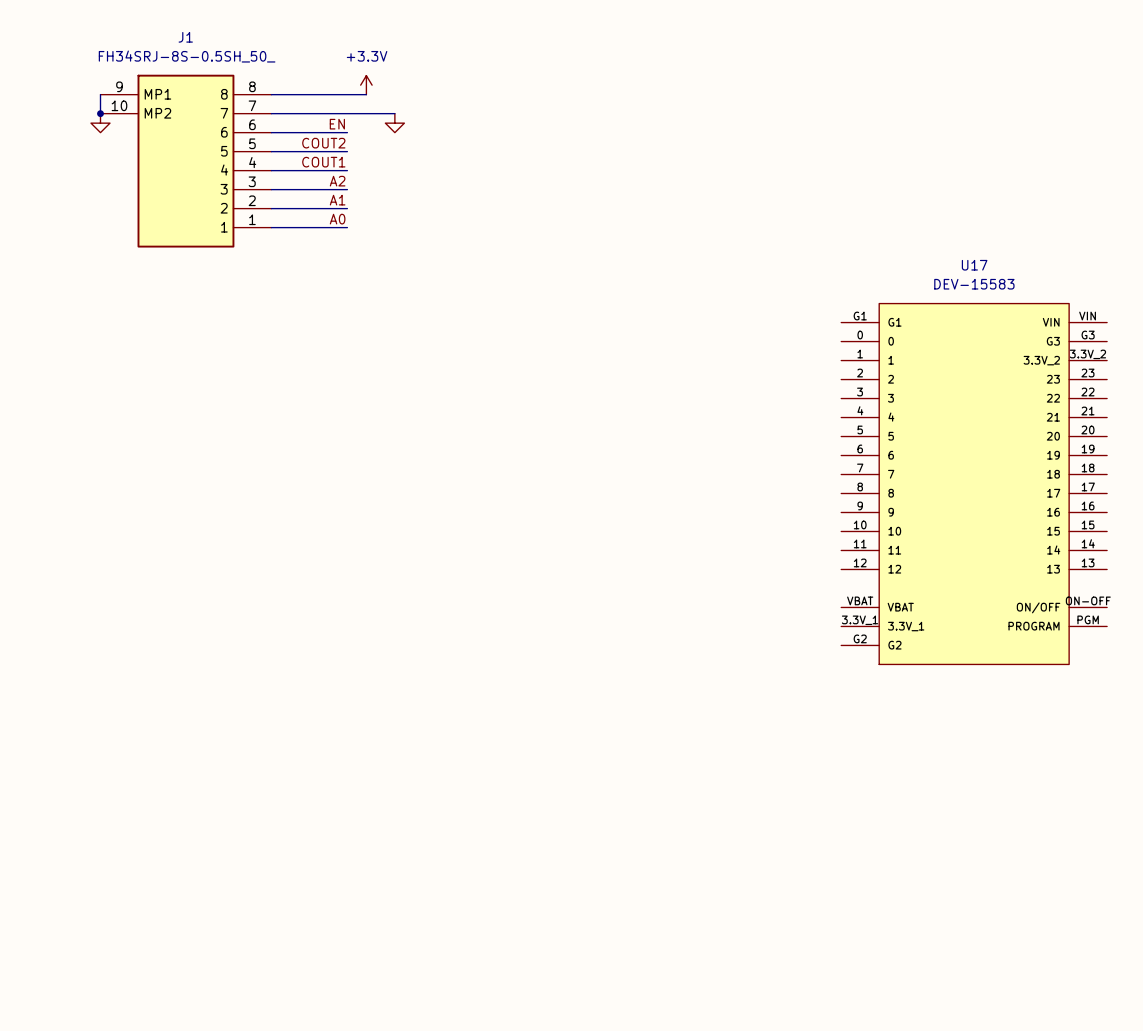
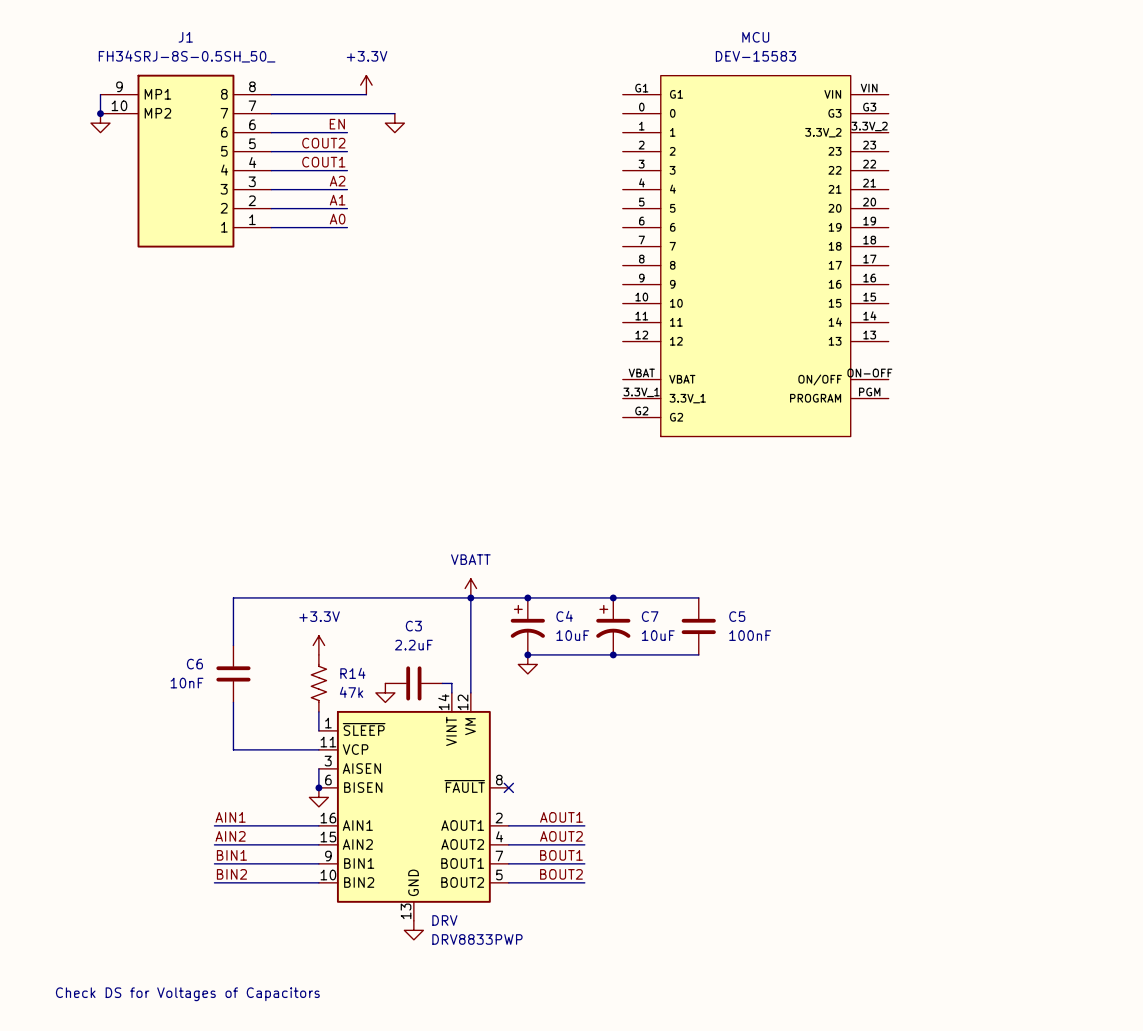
MCU: none -> DEV-15583 (755, 256)
U17: DEV-15583 (974, 484) -> none
power symbol: none -> VBATT (470, 588)
wire: none -> (470, 597) (470, 692)
junction: none -> (470, 597)
junction: none -> (527, 597)
junction: none -> (613, 597)
wire: none -> (698, 597) (233, 597) (233, 645)
C4: none -> 10uF (527, 626)
C7: none -> 10uF (613, 626)
C5: none -> 100nF (698, 626)
power symbol: none -> +3.3V (318, 645)
wire: none -> (527, 654) (698, 654)
junction: none -> (527, 654)
junction: none -> (613, 654)
power symbol: none -> (527, 664)
C6: none -> 10nF (233, 673)
R14: none -> 47k (318, 683)
C3: none -> 2.2uF (413, 683)
wire: none -> (442, 683) (451, 683) (451, 692)
power symbol: none -> (385, 692)
wire: none -> (233, 702) (233, 749) (318, 749)
wire: none -> (318, 711) (318, 730)
wire: none -> (318, 768) (318, 787)
junction: none -> (318, 787)
no-connect mark: none -> (508, 787)
power symbol: none -> (318, 797)
DRV: none -> DRV8833PWP (413, 806)
label: none -> AIN1 (230, 817)
label: none -> AOUT1 (561, 817)
wire: none -> (214, 825) (318, 825)
wire: none -> (508, 825) (584, 825)
label: none -> AIN2 (230, 836)
label: none -> AOUT2 (561, 836)
wire: none -> (214, 844) (318, 844)
wire: none -> (508, 844) (584, 844)
label: none -> BIN1 (231, 855)
label: none -> BOUT1 (561, 855)
wire: none -> (214, 863) (318, 863)
wire: none -> (508, 863) (584, 863)
label: none -> BIN2 (231, 874)
label: none -> BOUT2 (561, 874)
wire: none -> (214, 882) (318, 882)
wire: none -> (508, 882) (584, 882)
power symbol: none -> (413, 930)
text: none -> Check DS for Voltages of Capacitors (187, 994)

